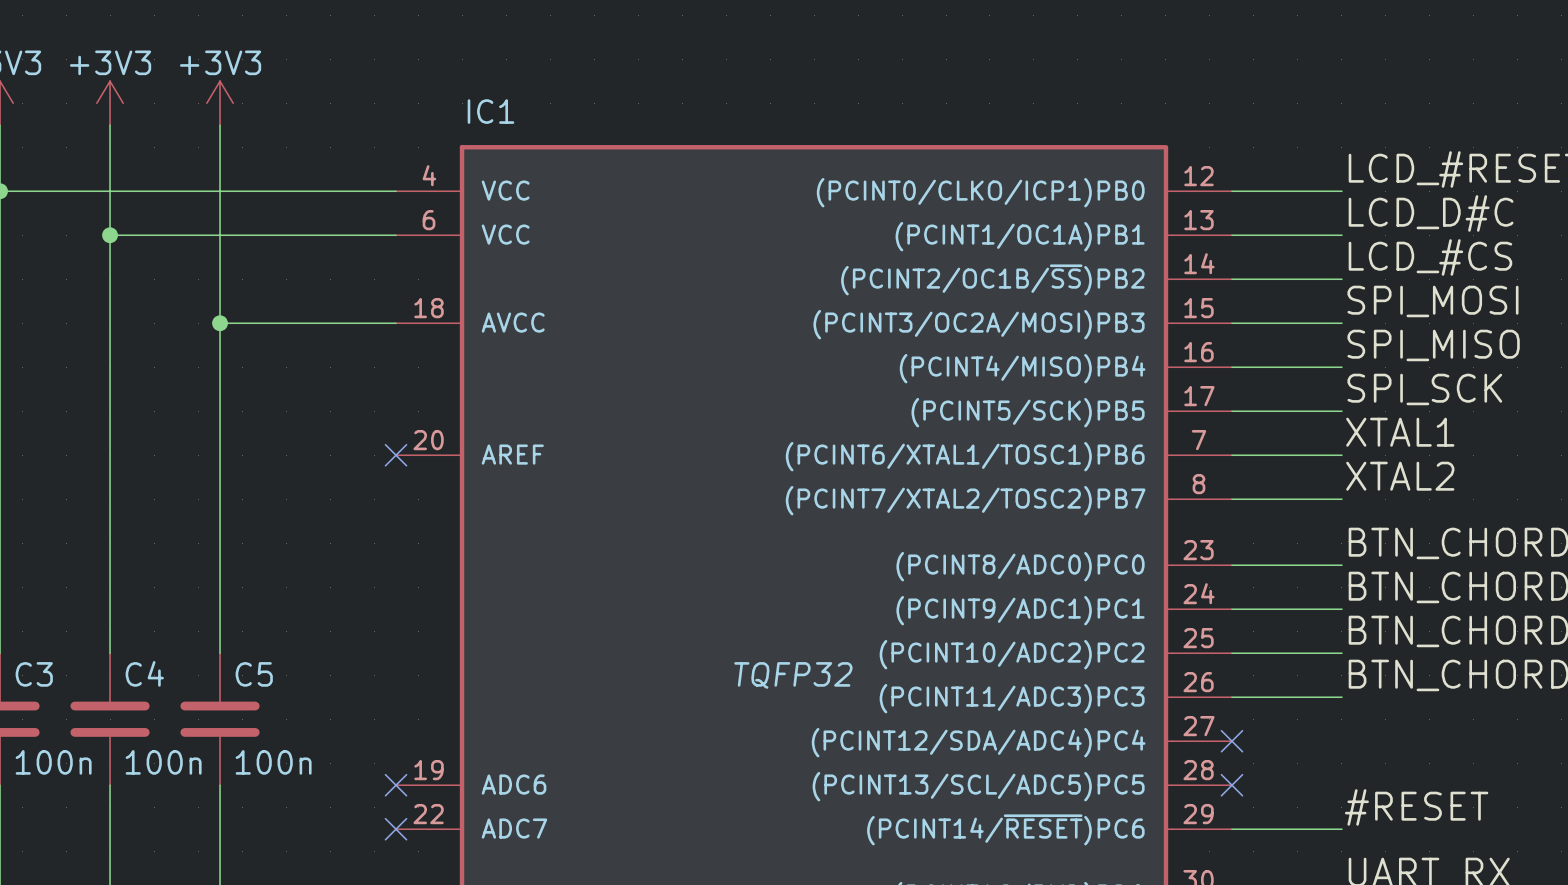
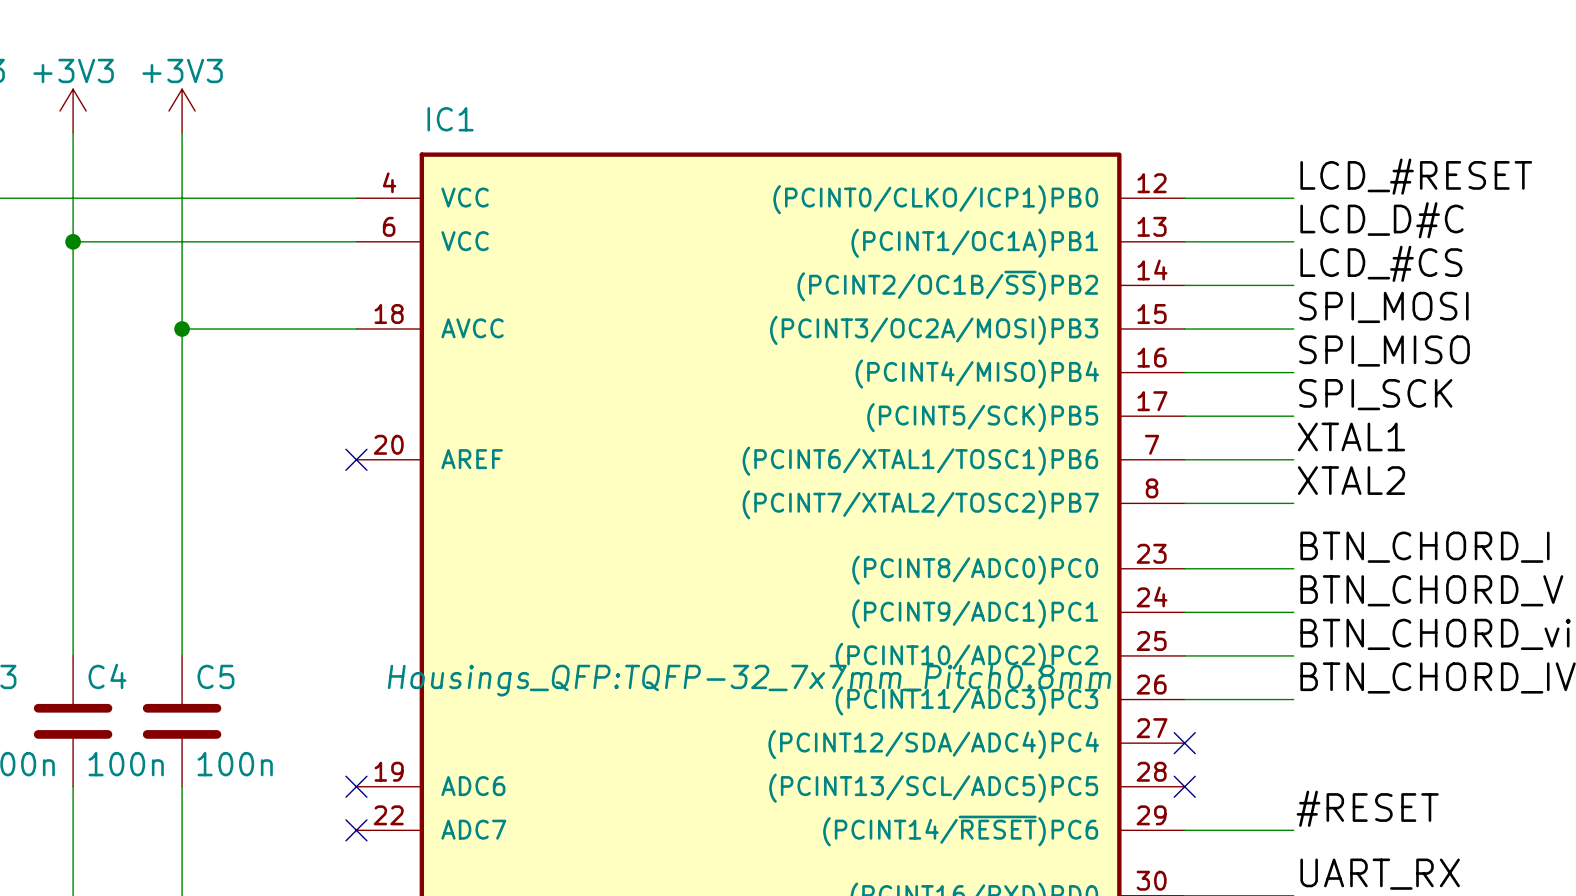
IC1 text: TQFP32 (793, 675) -> Housings_QFP:TQFP-32_7x7mm_Pitch0.8mm (749, 680)

